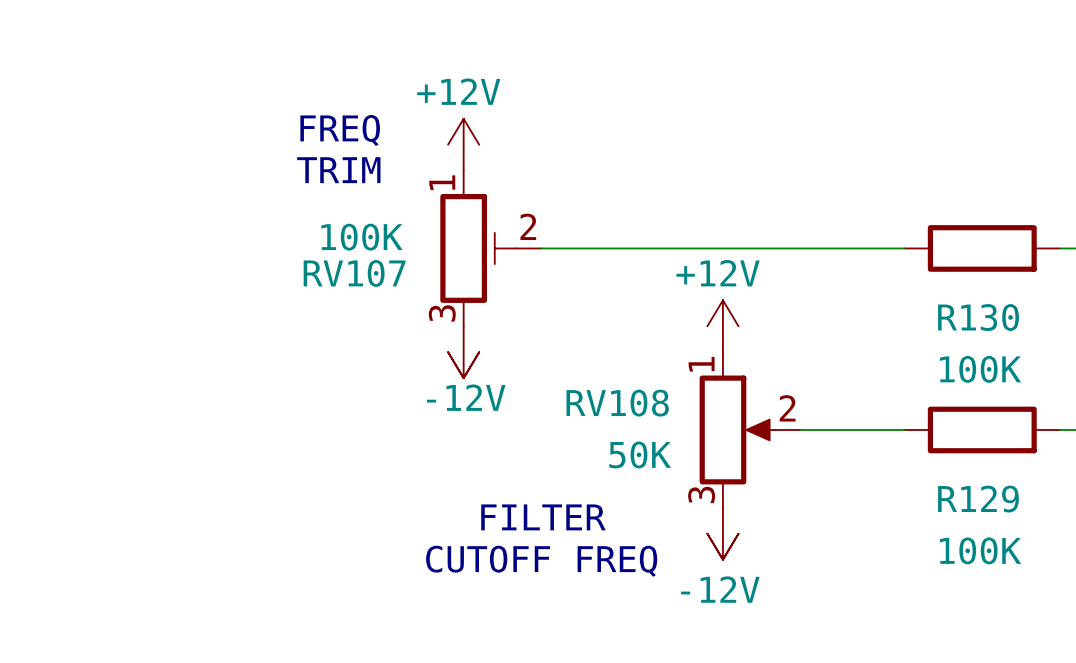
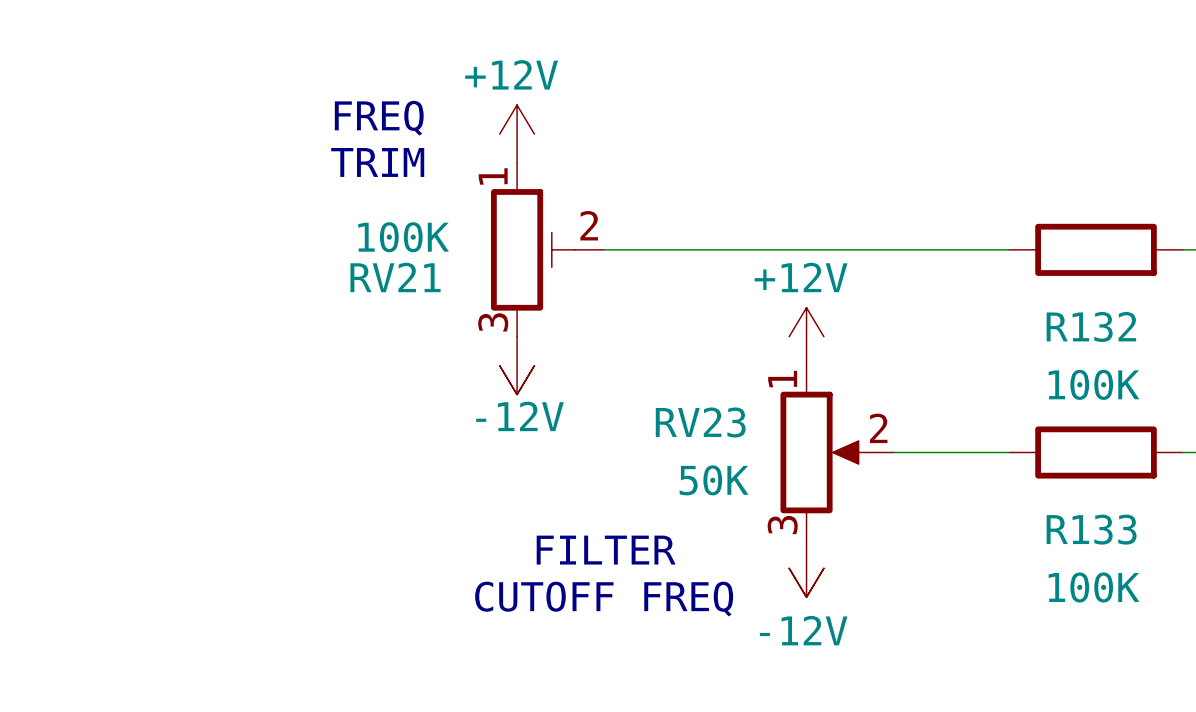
RV107 name: RV107 (354, 273) -> RV21 (395, 277)
R130 name: R130 (978, 317) -> R132 (1091, 326)
RV108 name: RV108 (617, 403) -> RV23 (700, 422)
R129 name: R129 (978, 499) -> R133 (1091, 529)

